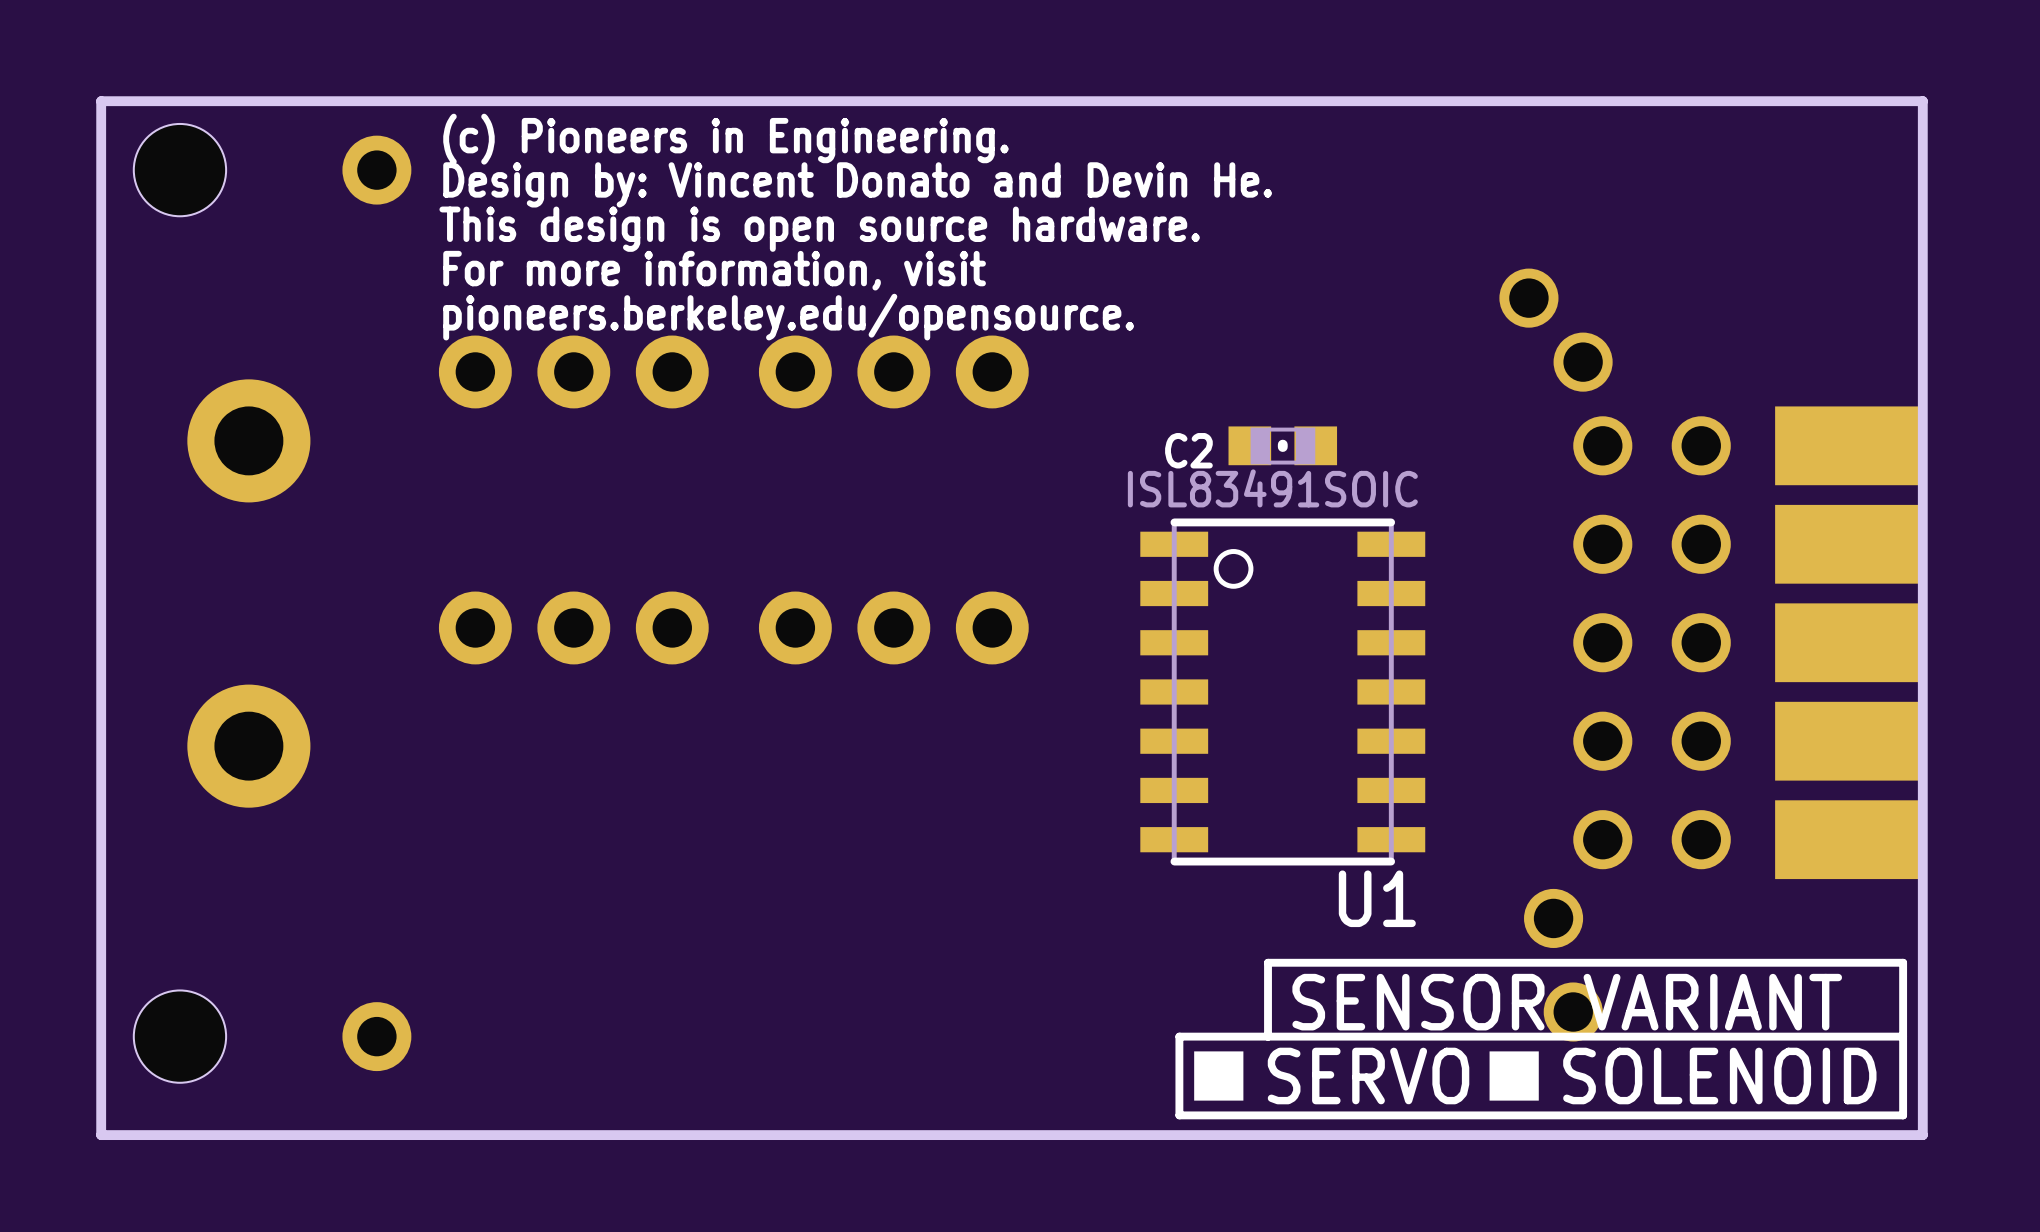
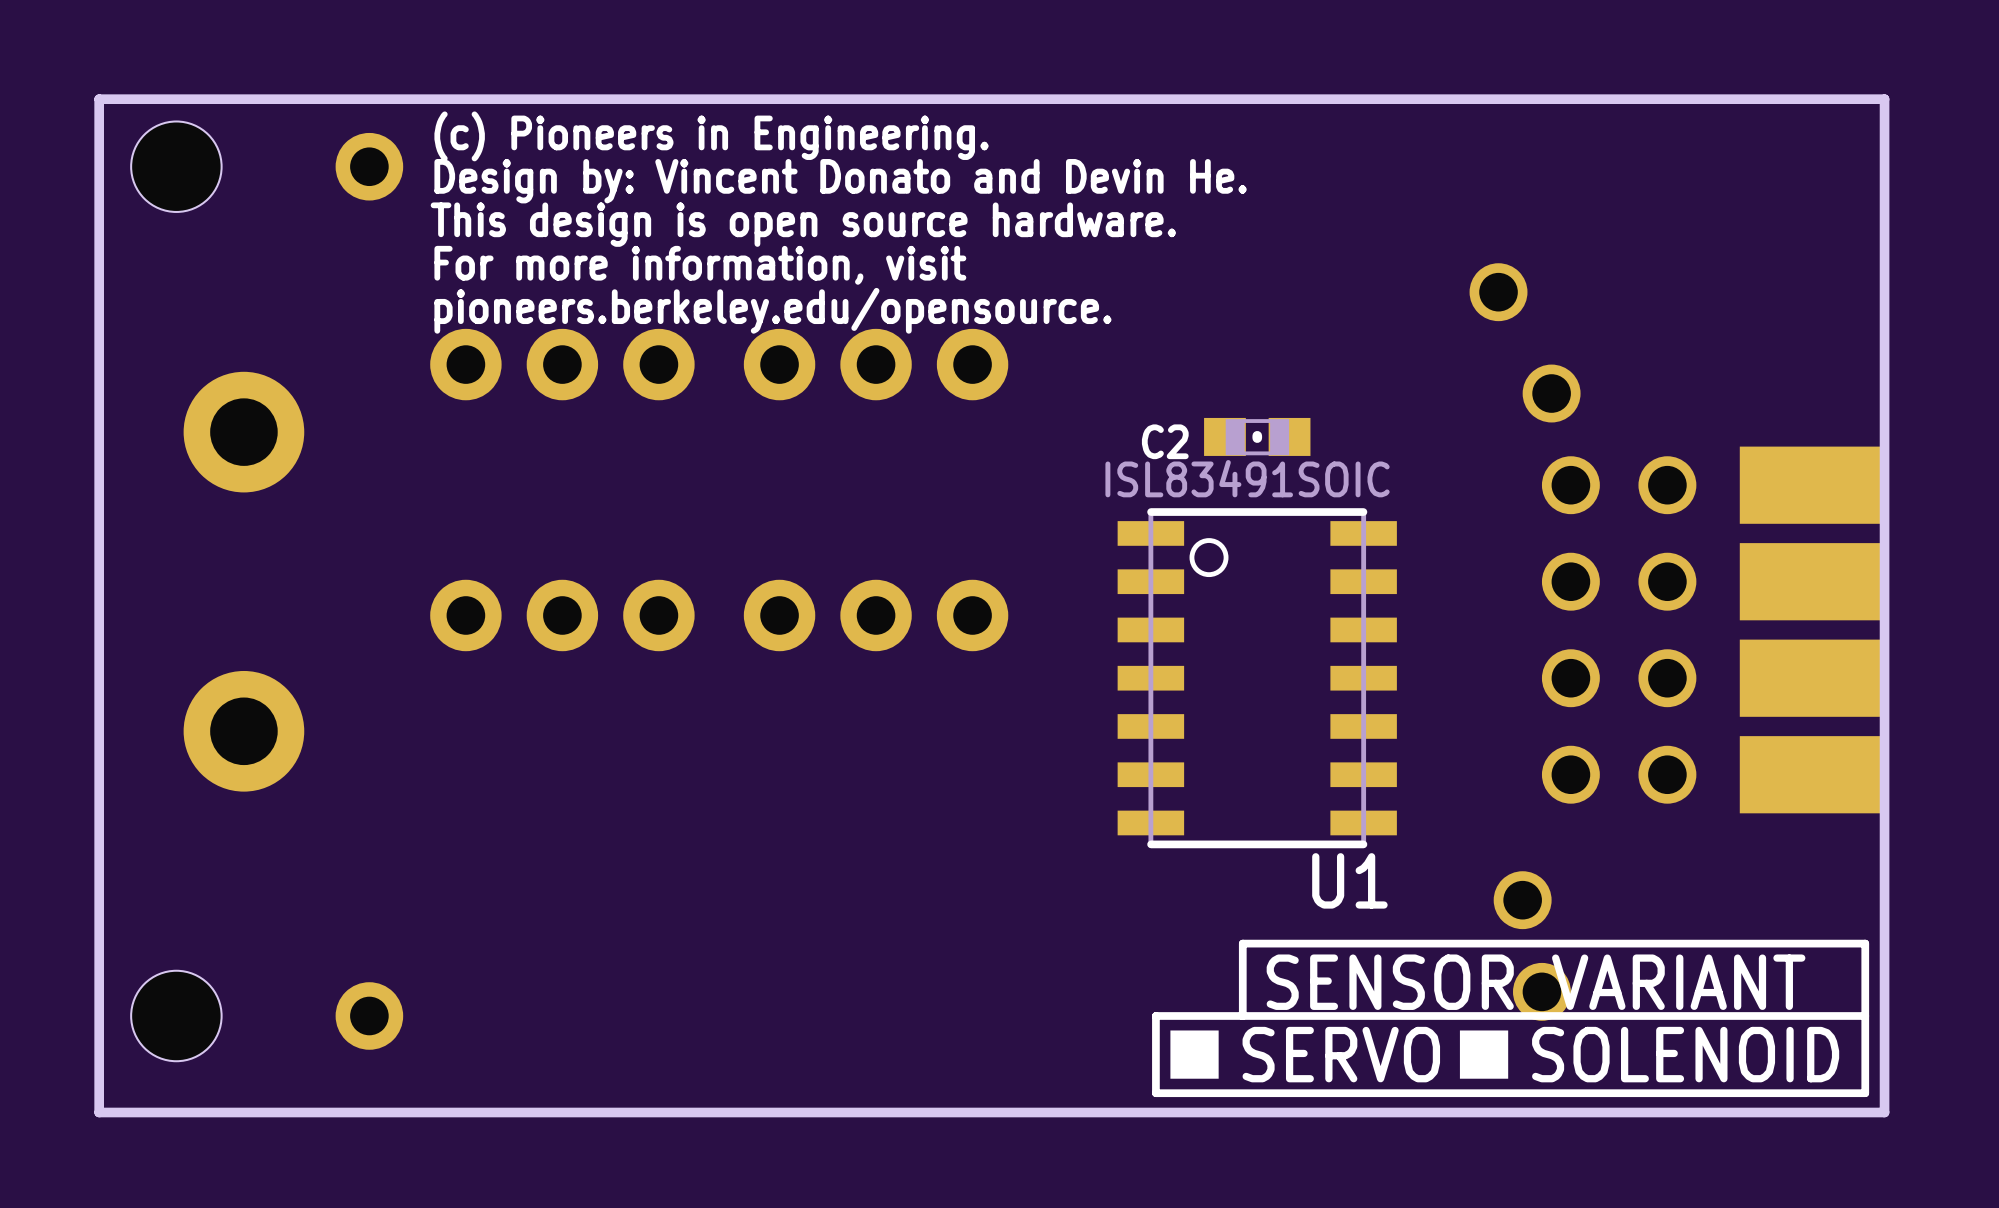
part position: (1583, 362) -> (1551, 393)
part footprint: [1775, 406, 1923, 880] -> [1739, 446, 1885, 814]
part footprint: [1573, 416, 1731, 870] -> [1541, 456, 1697, 804]

